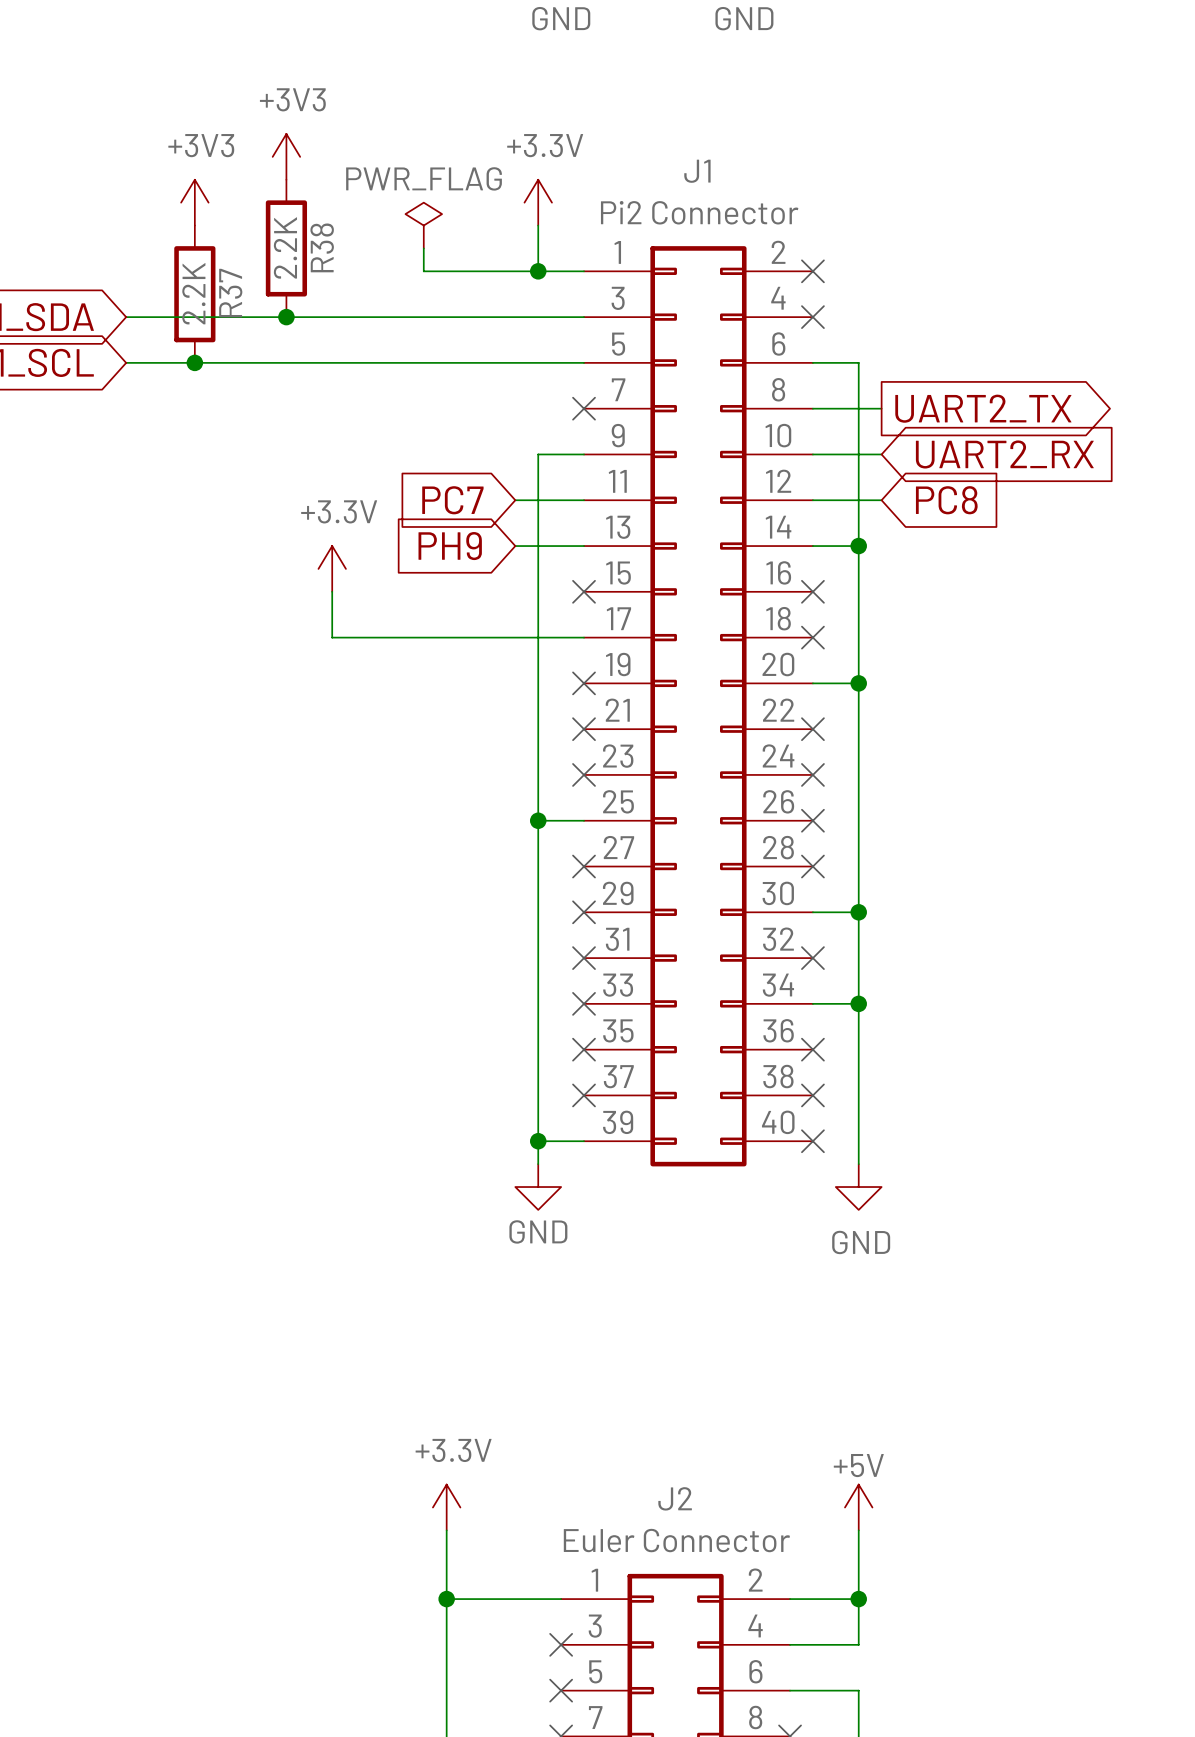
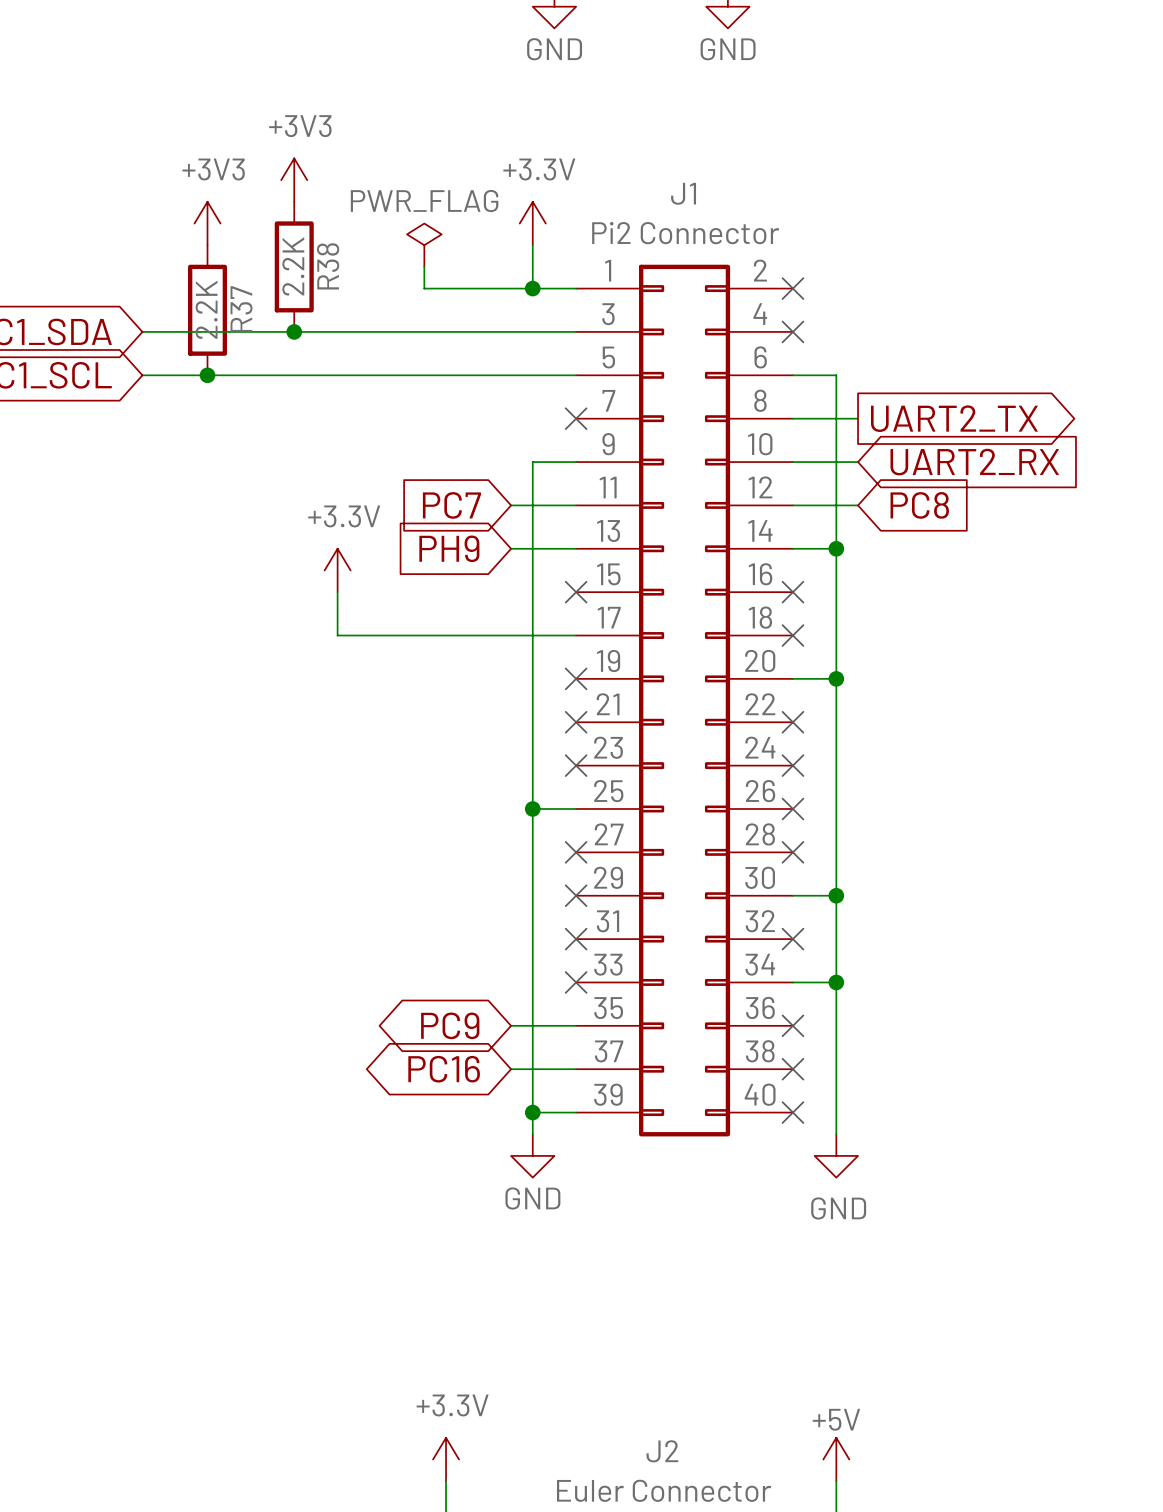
global label: none -> PC9 (450, 1025)
wire: none -> (511, 1025) (576, 1025)
no-connect mark: (584, 1049) -> none
global label: none -> PC16 (444, 1069)
wire: none -> (511, 1069) (576, 1069)
no-connect mark: (584, 1095) -> none

